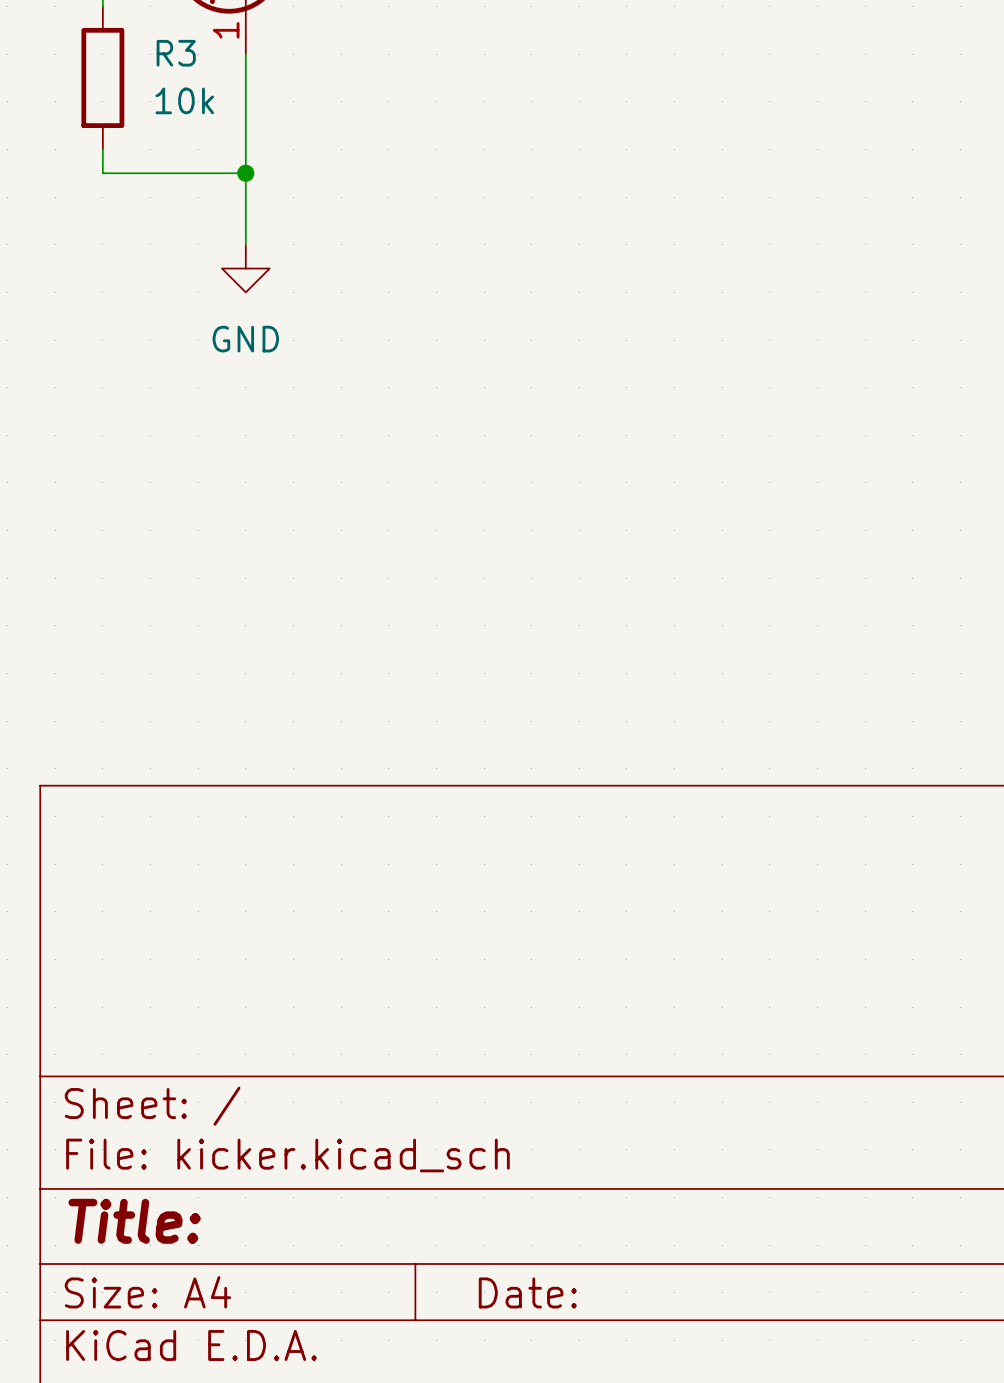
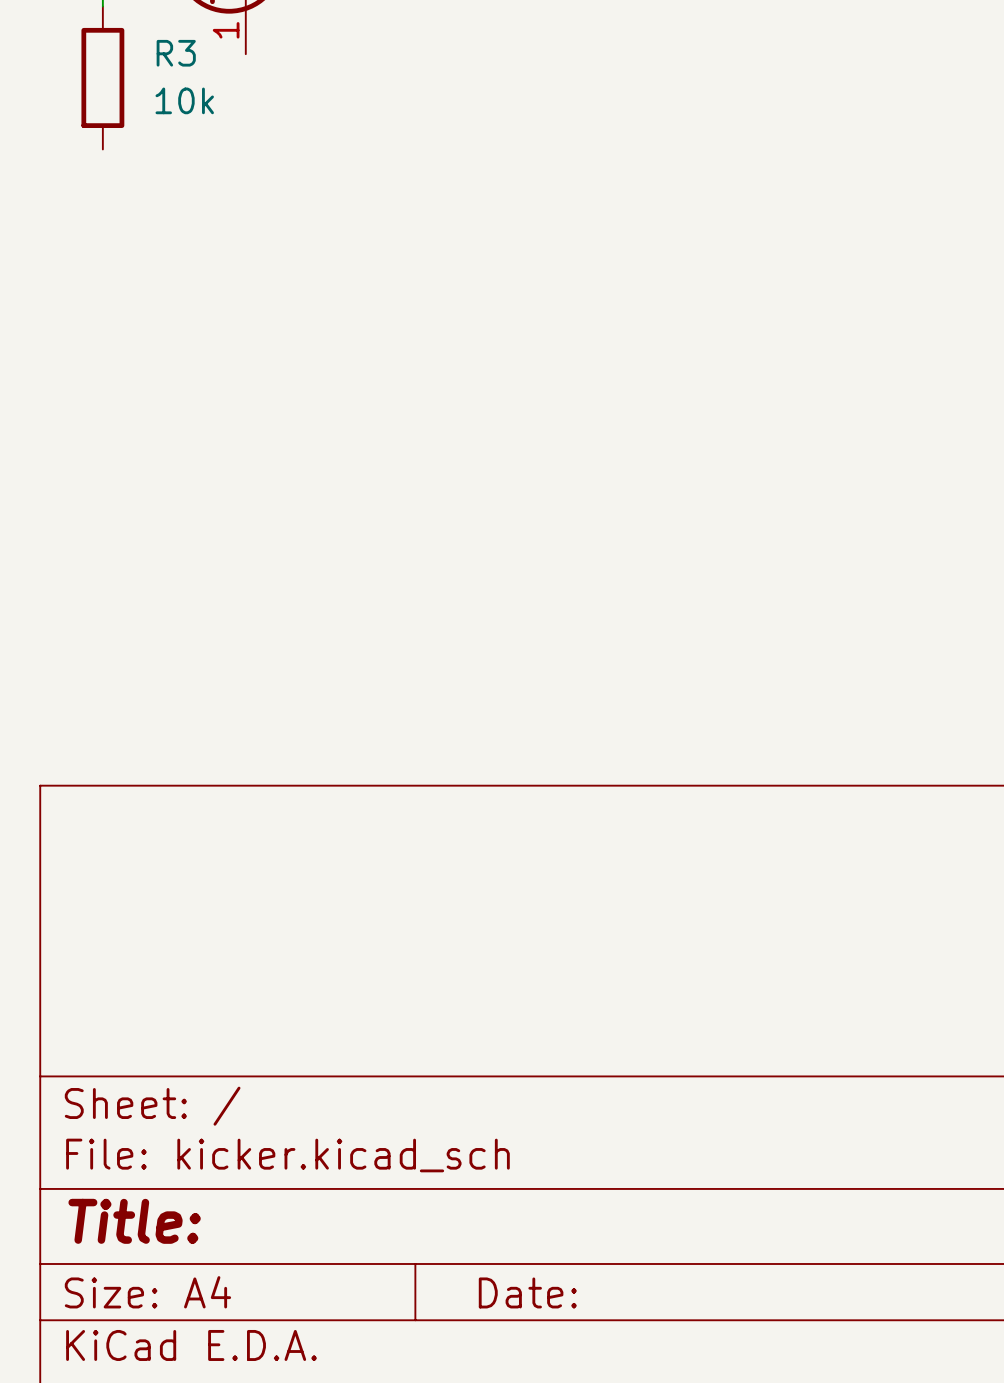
wire: (245, 54) (245, 244) -> none
wire: (102, 149) (102, 173) (245, 173) -> none
junction: (245, 173) -> none
power symbol: GND (245, 268) -> none

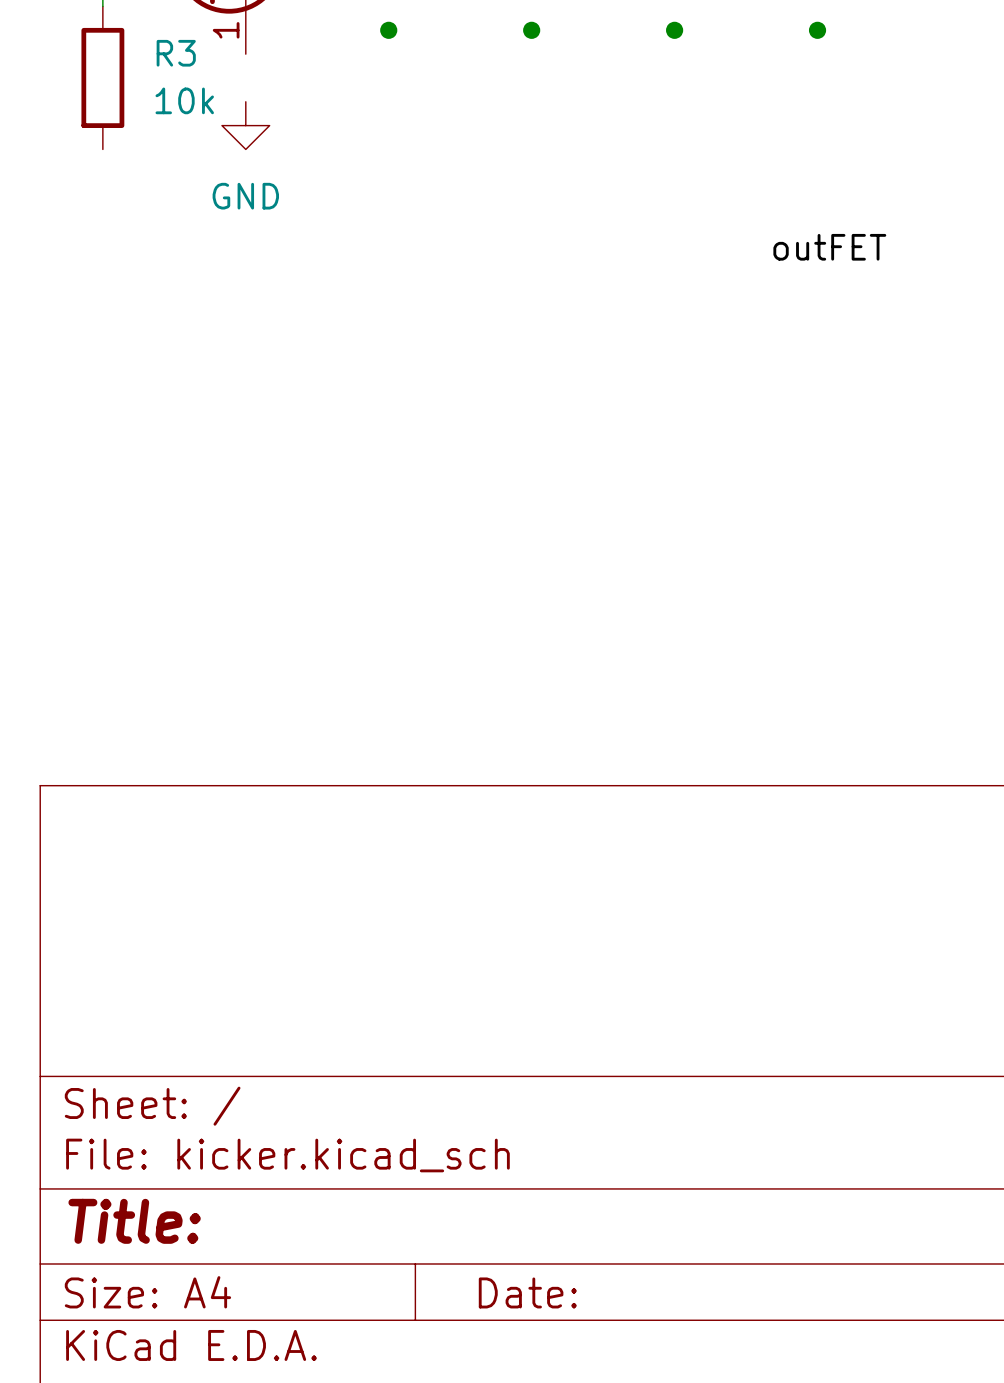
junction: none -> (388, 30)
junction: none -> (531, 30)
junction: none -> (674, 30)
junction: none -> (817, 30)
power symbol: none -> GND (245, 125)
label: none -> outFET (829, 247)

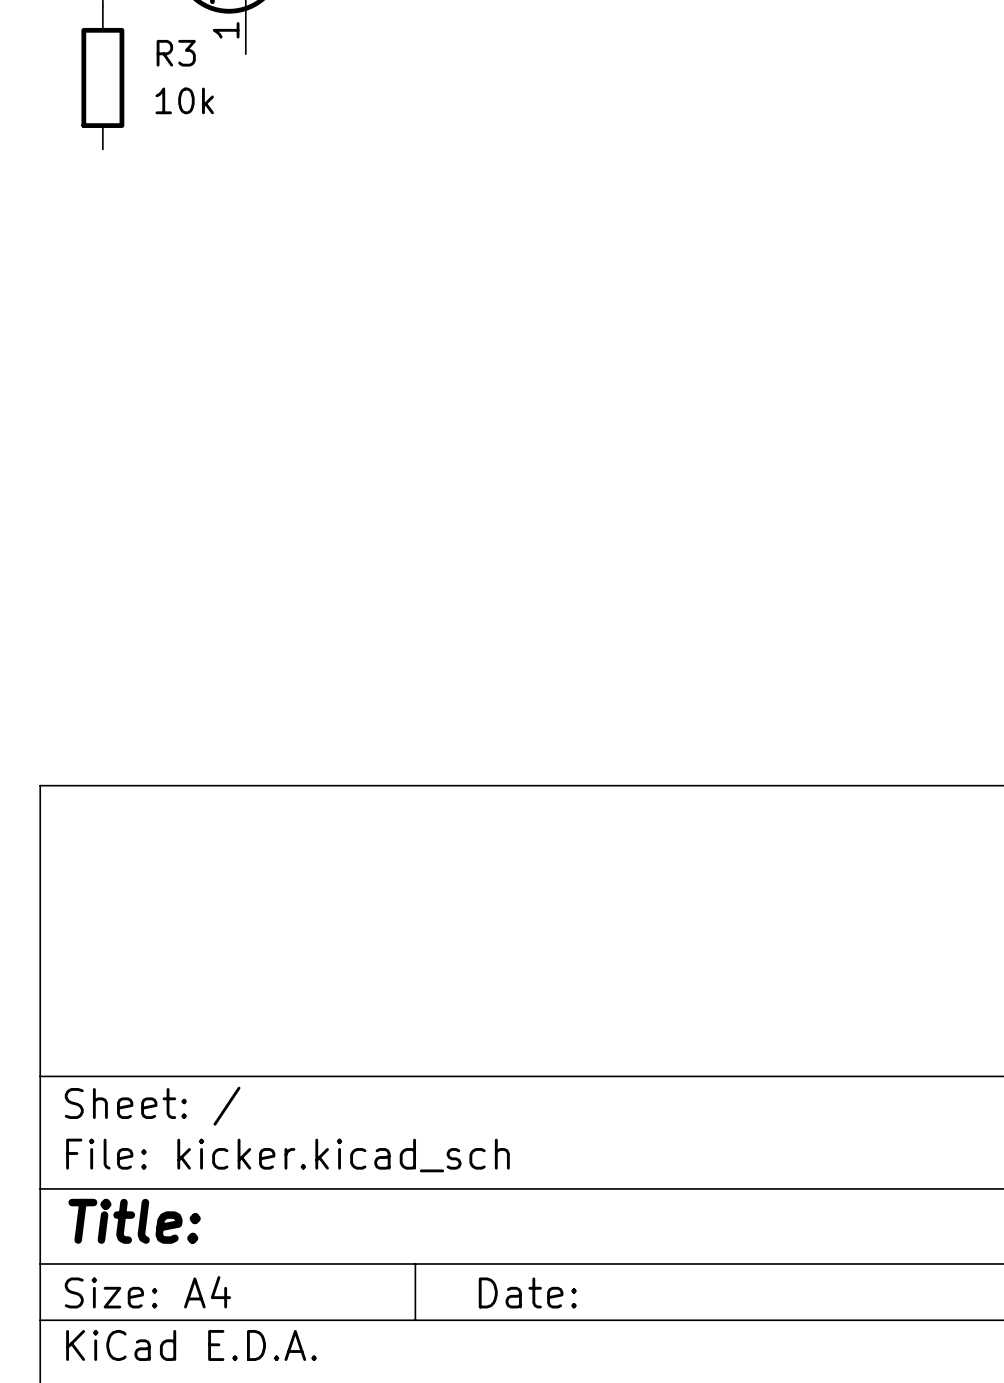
junction: (388, 30) -> none
junction: (531, 30) -> none
junction: (674, 30) -> none
junction: (817, 30) -> none
power symbol: GND (245, 125) -> none
label: outFET (829, 247) -> none

